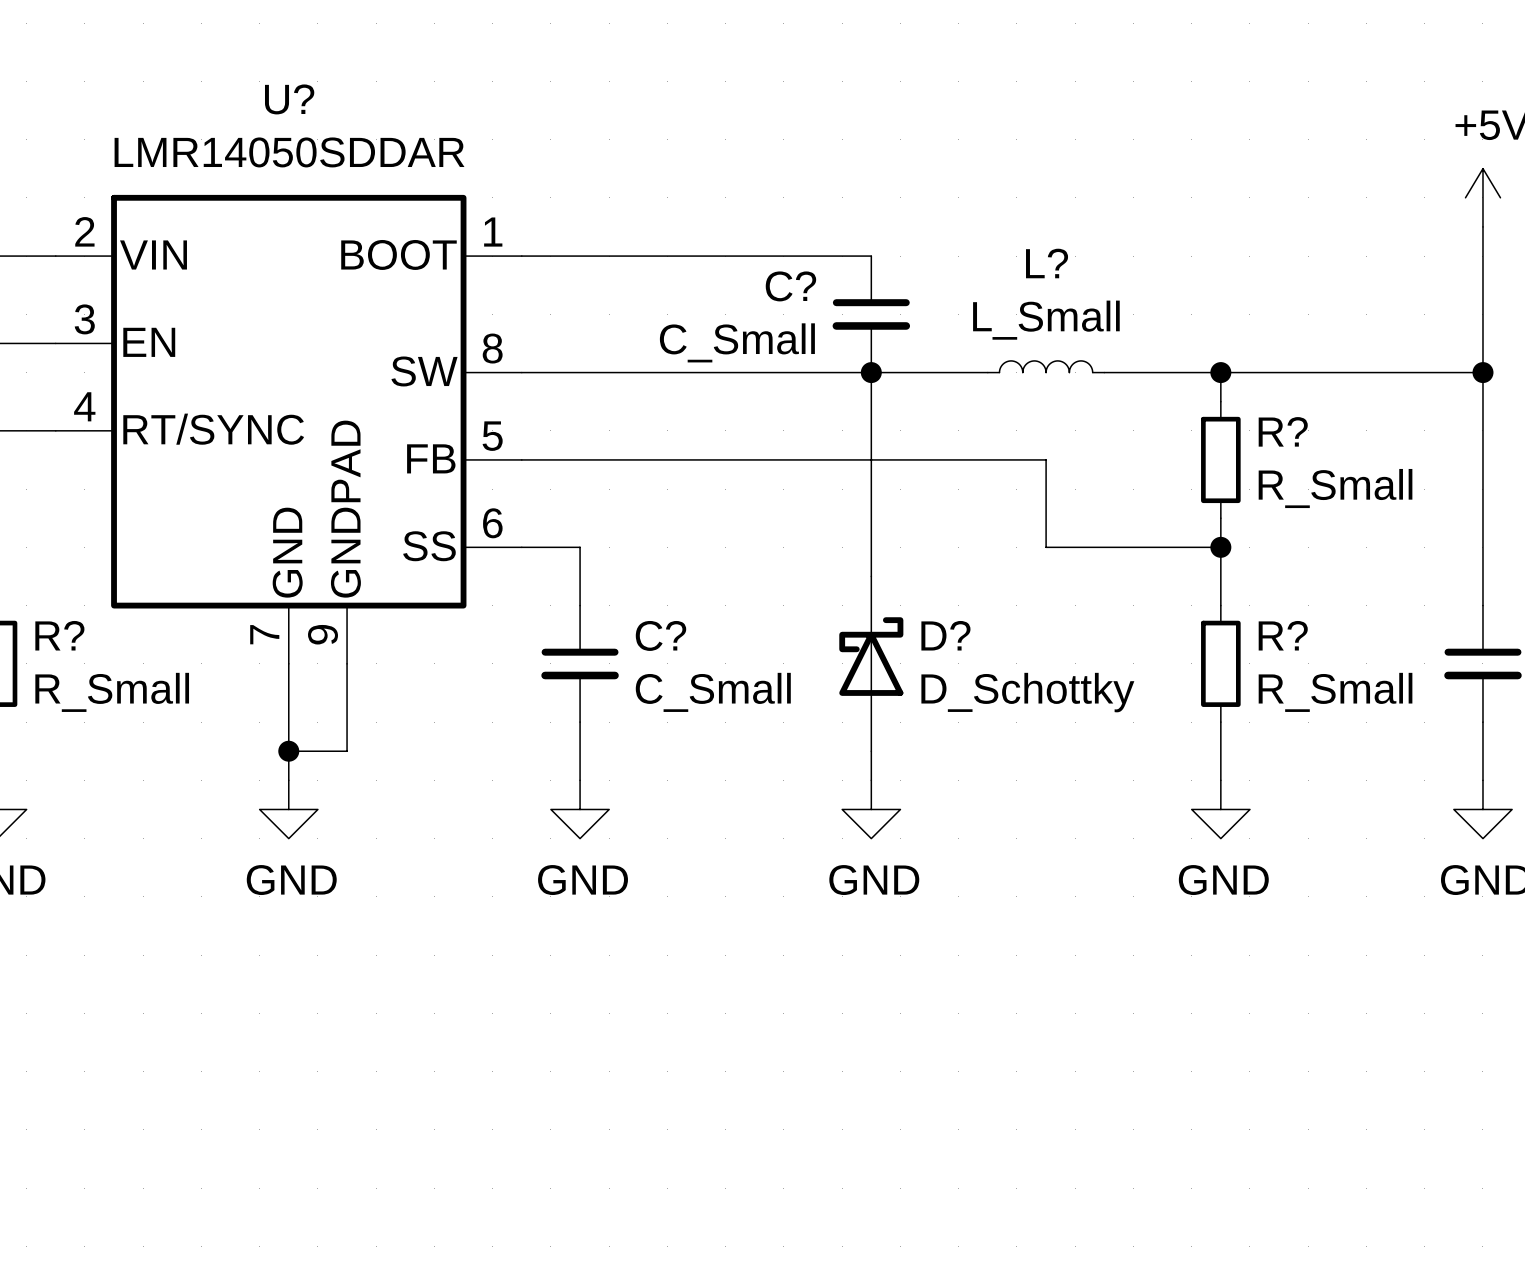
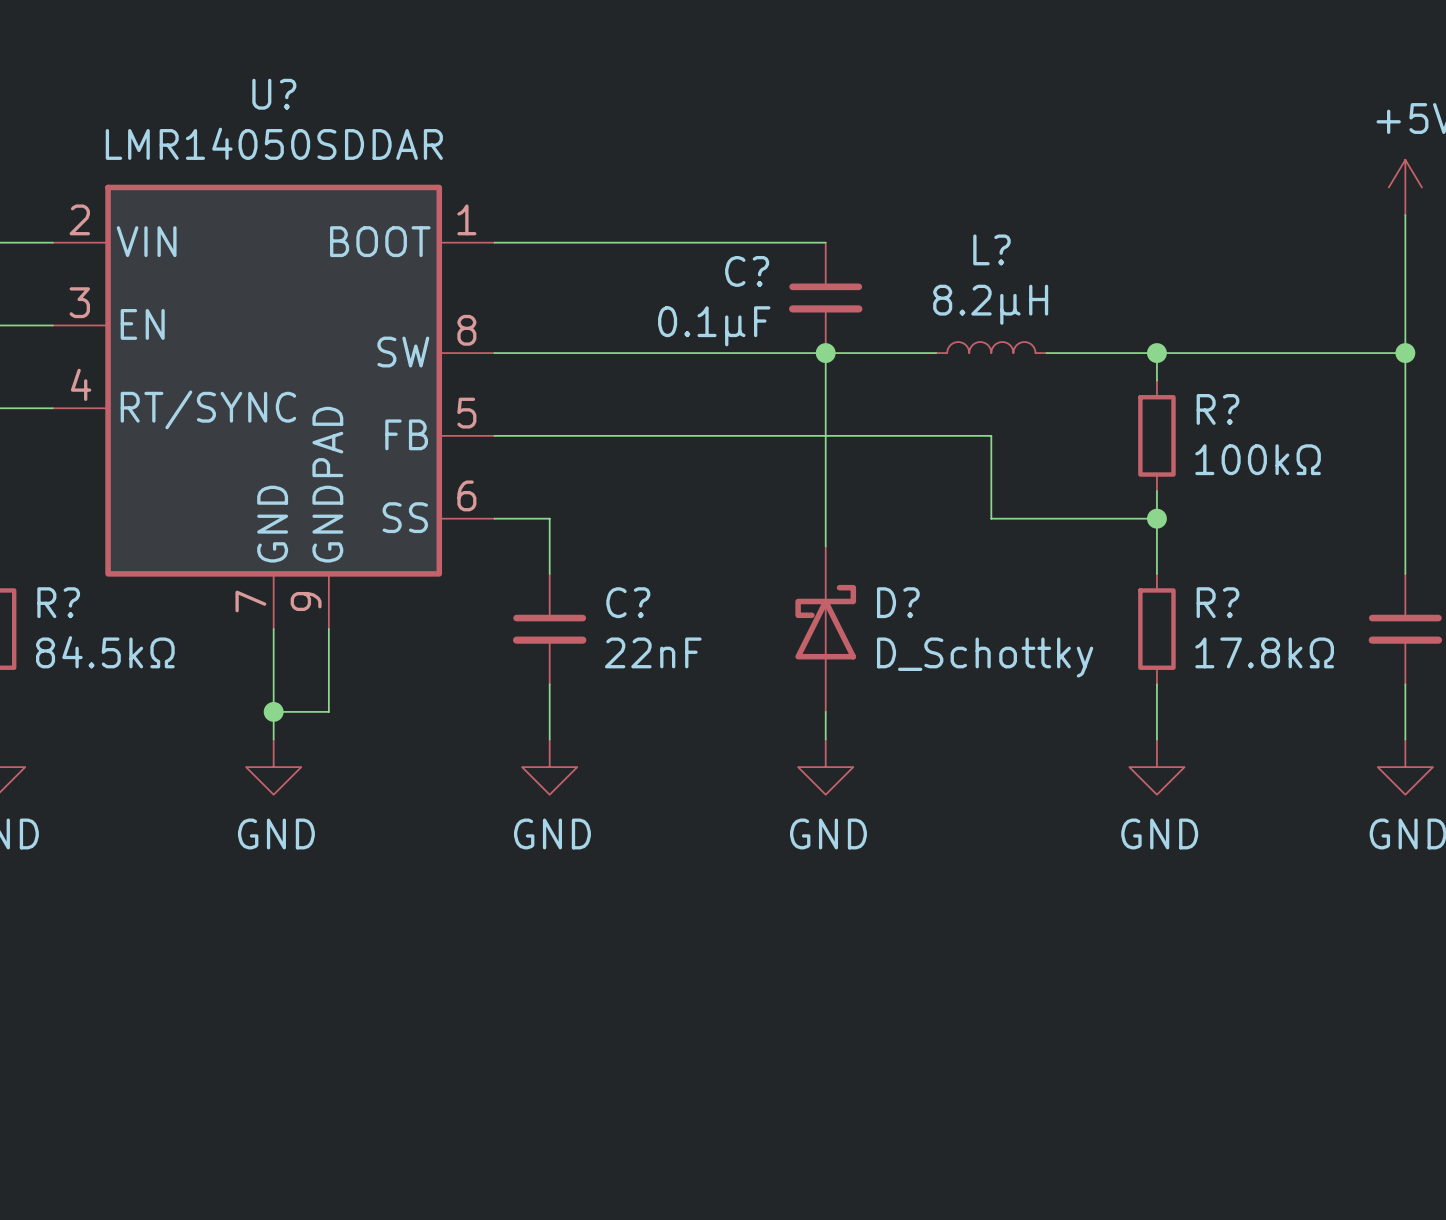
L? value: L_Small (1046, 320) -> 8.2μH (990, 304)
C? value: C_Small (737, 342) -> 0.1μF (714, 326)
R? value: R_Small (1335, 488) -> 100kΩ (1258, 459)
R? value: R_Small (112, 692) -> 84.5kΩ (105, 652)
C? value: C_Small (713, 692) -> 22nF (653, 652)
R? value: R_Small (1335, 692) -> 17.8kΩ (1264, 652)

